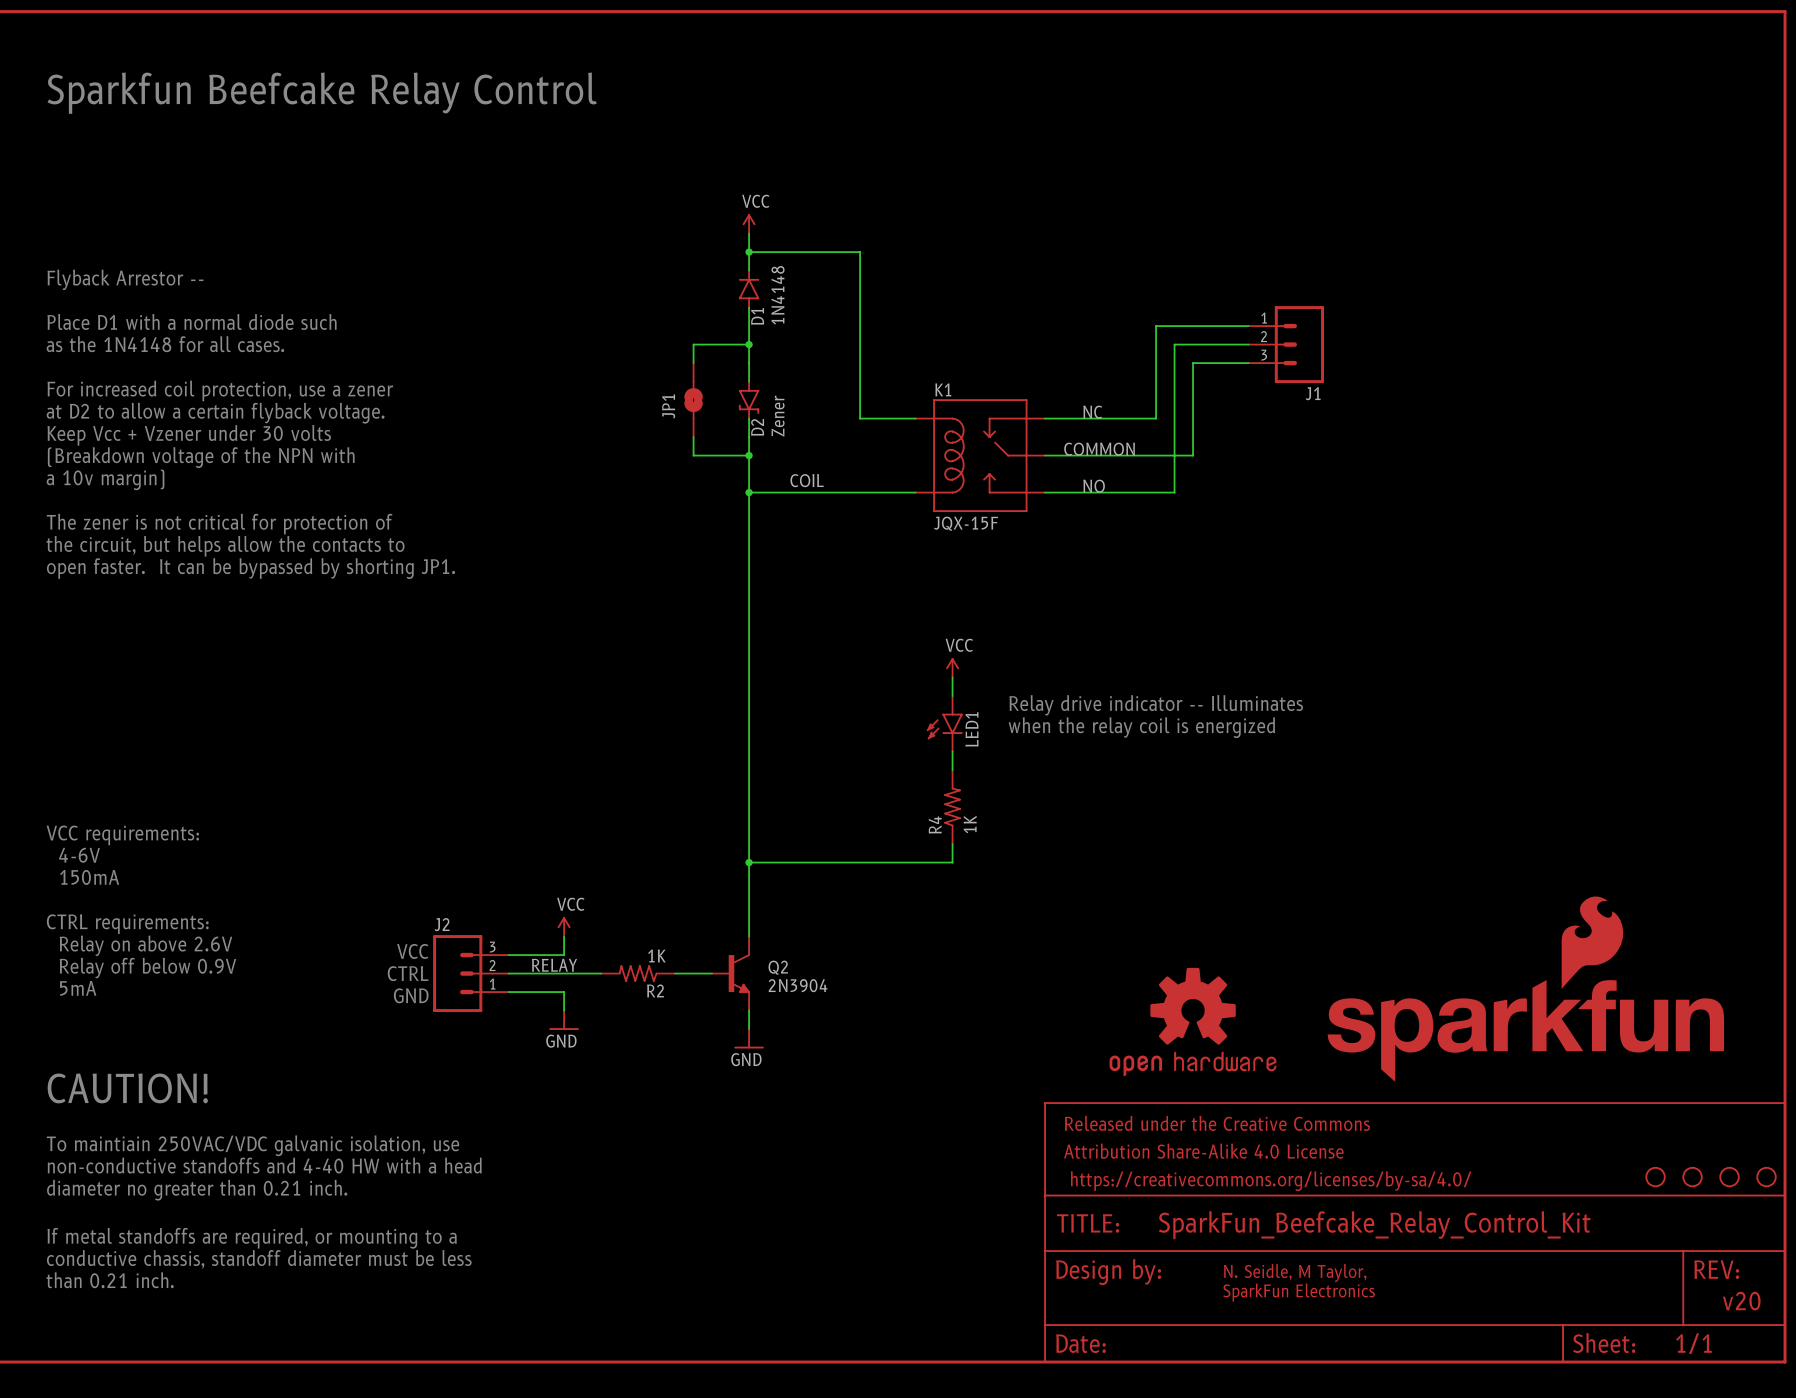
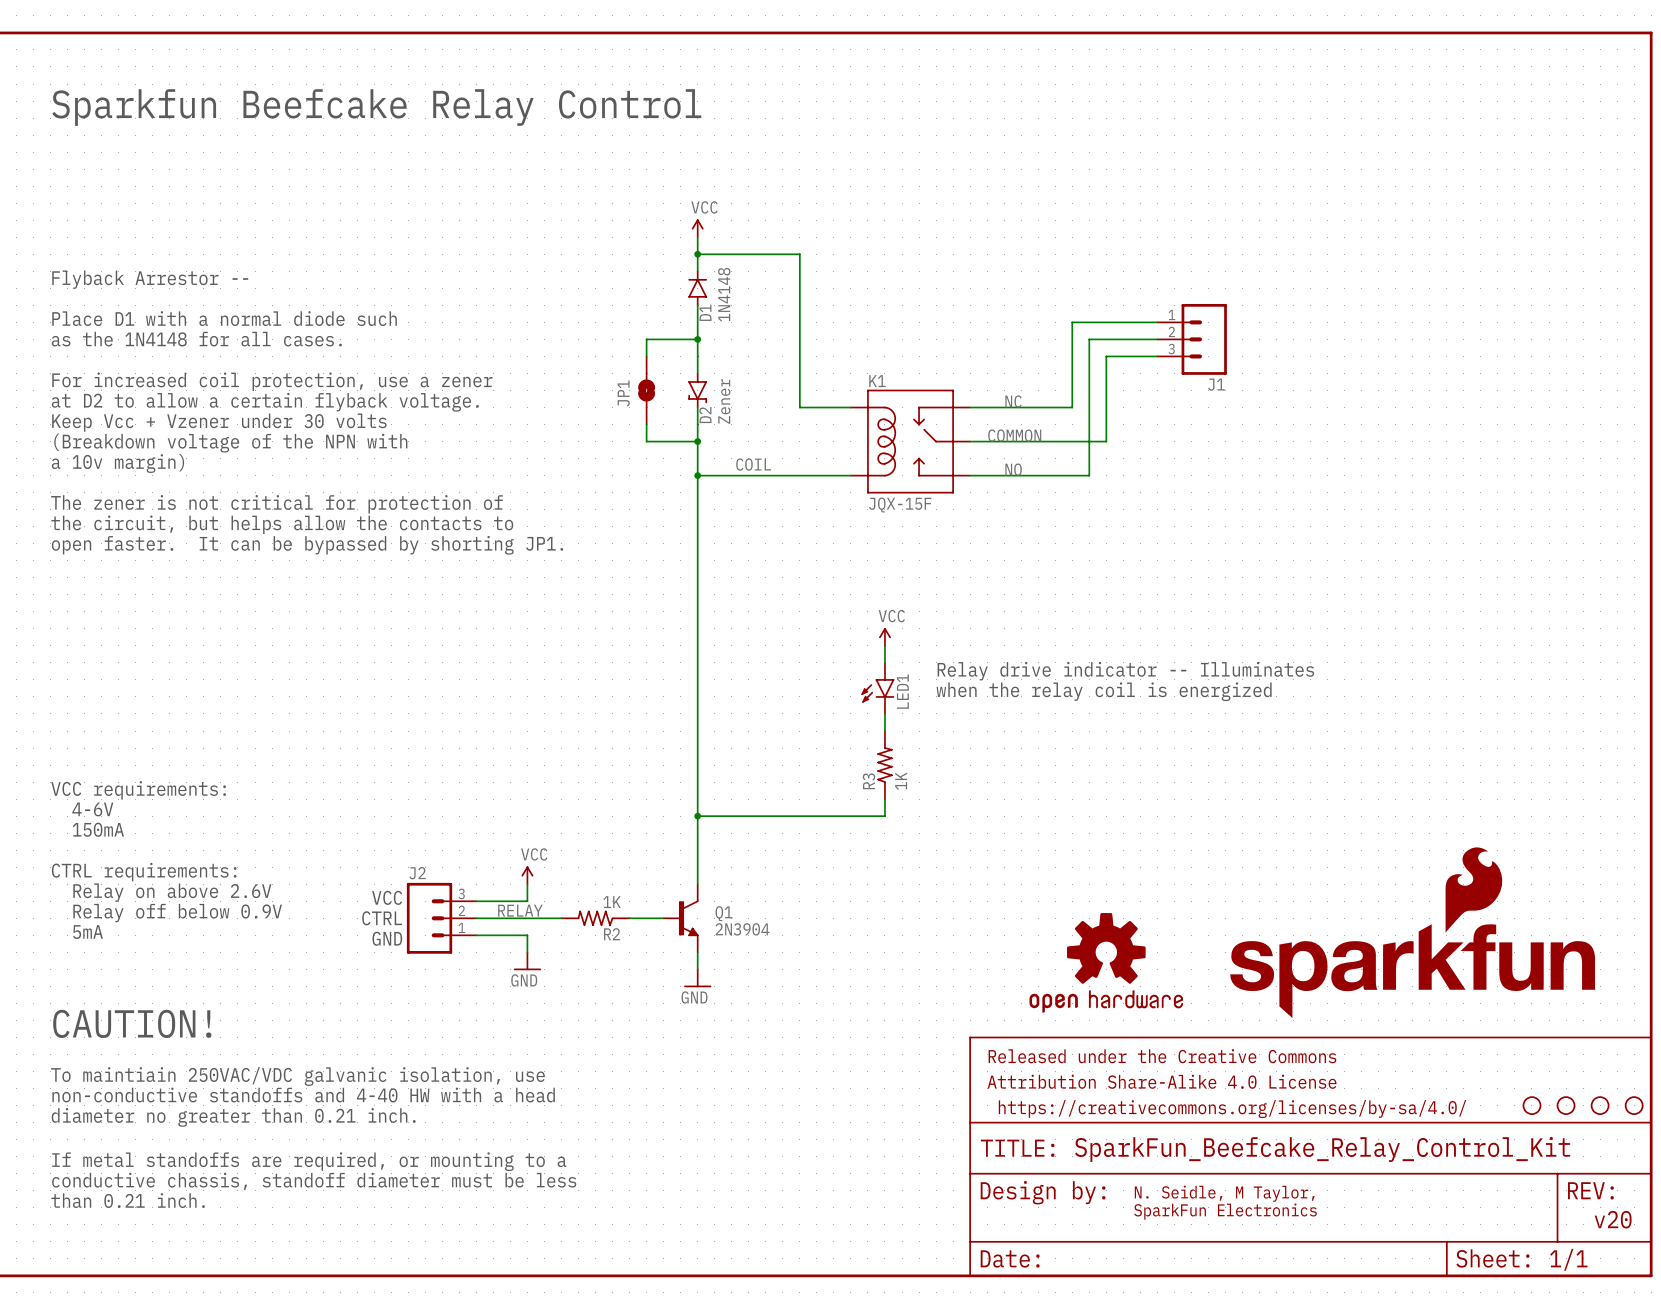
R4 name: R4 (935, 825) -> R3 (868, 781)
Q2 name: Q2 (778, 967) -> Q1 (724, 913)

